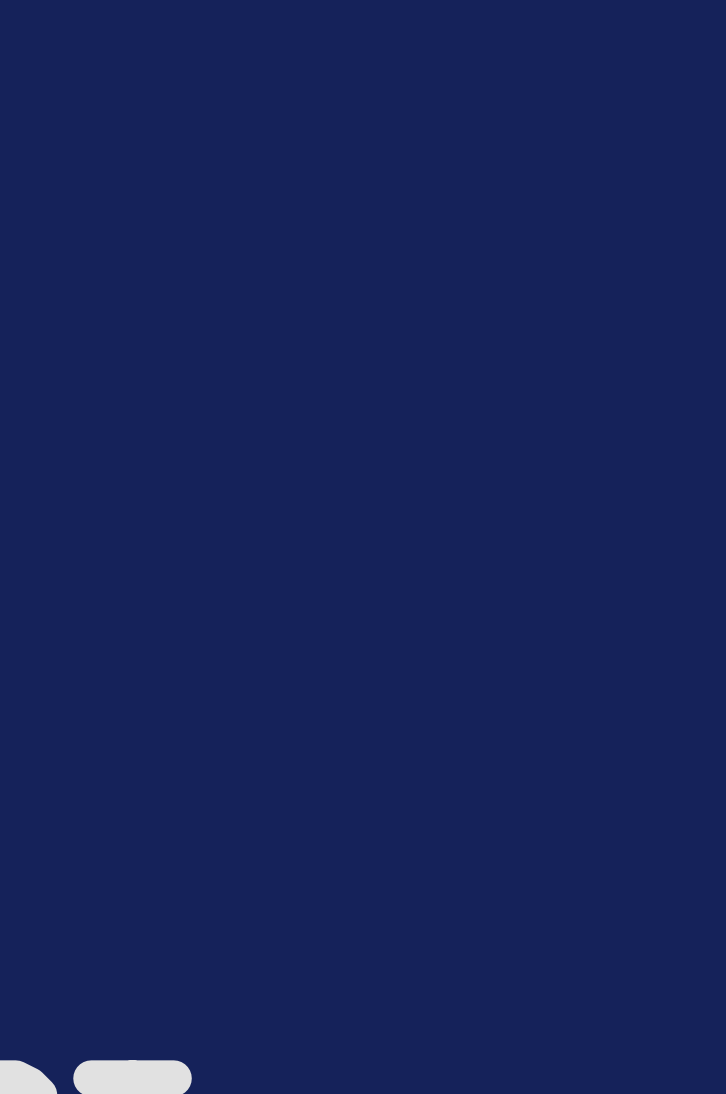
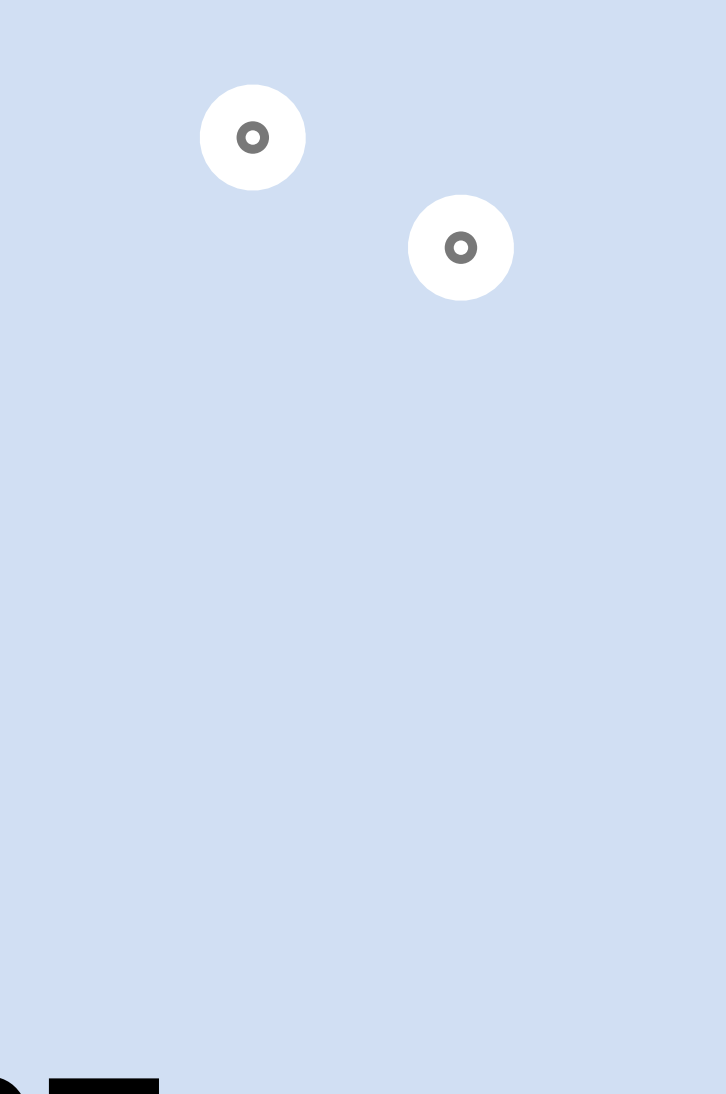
via: none -> (252, 137)
via: none -> (460, 247)

